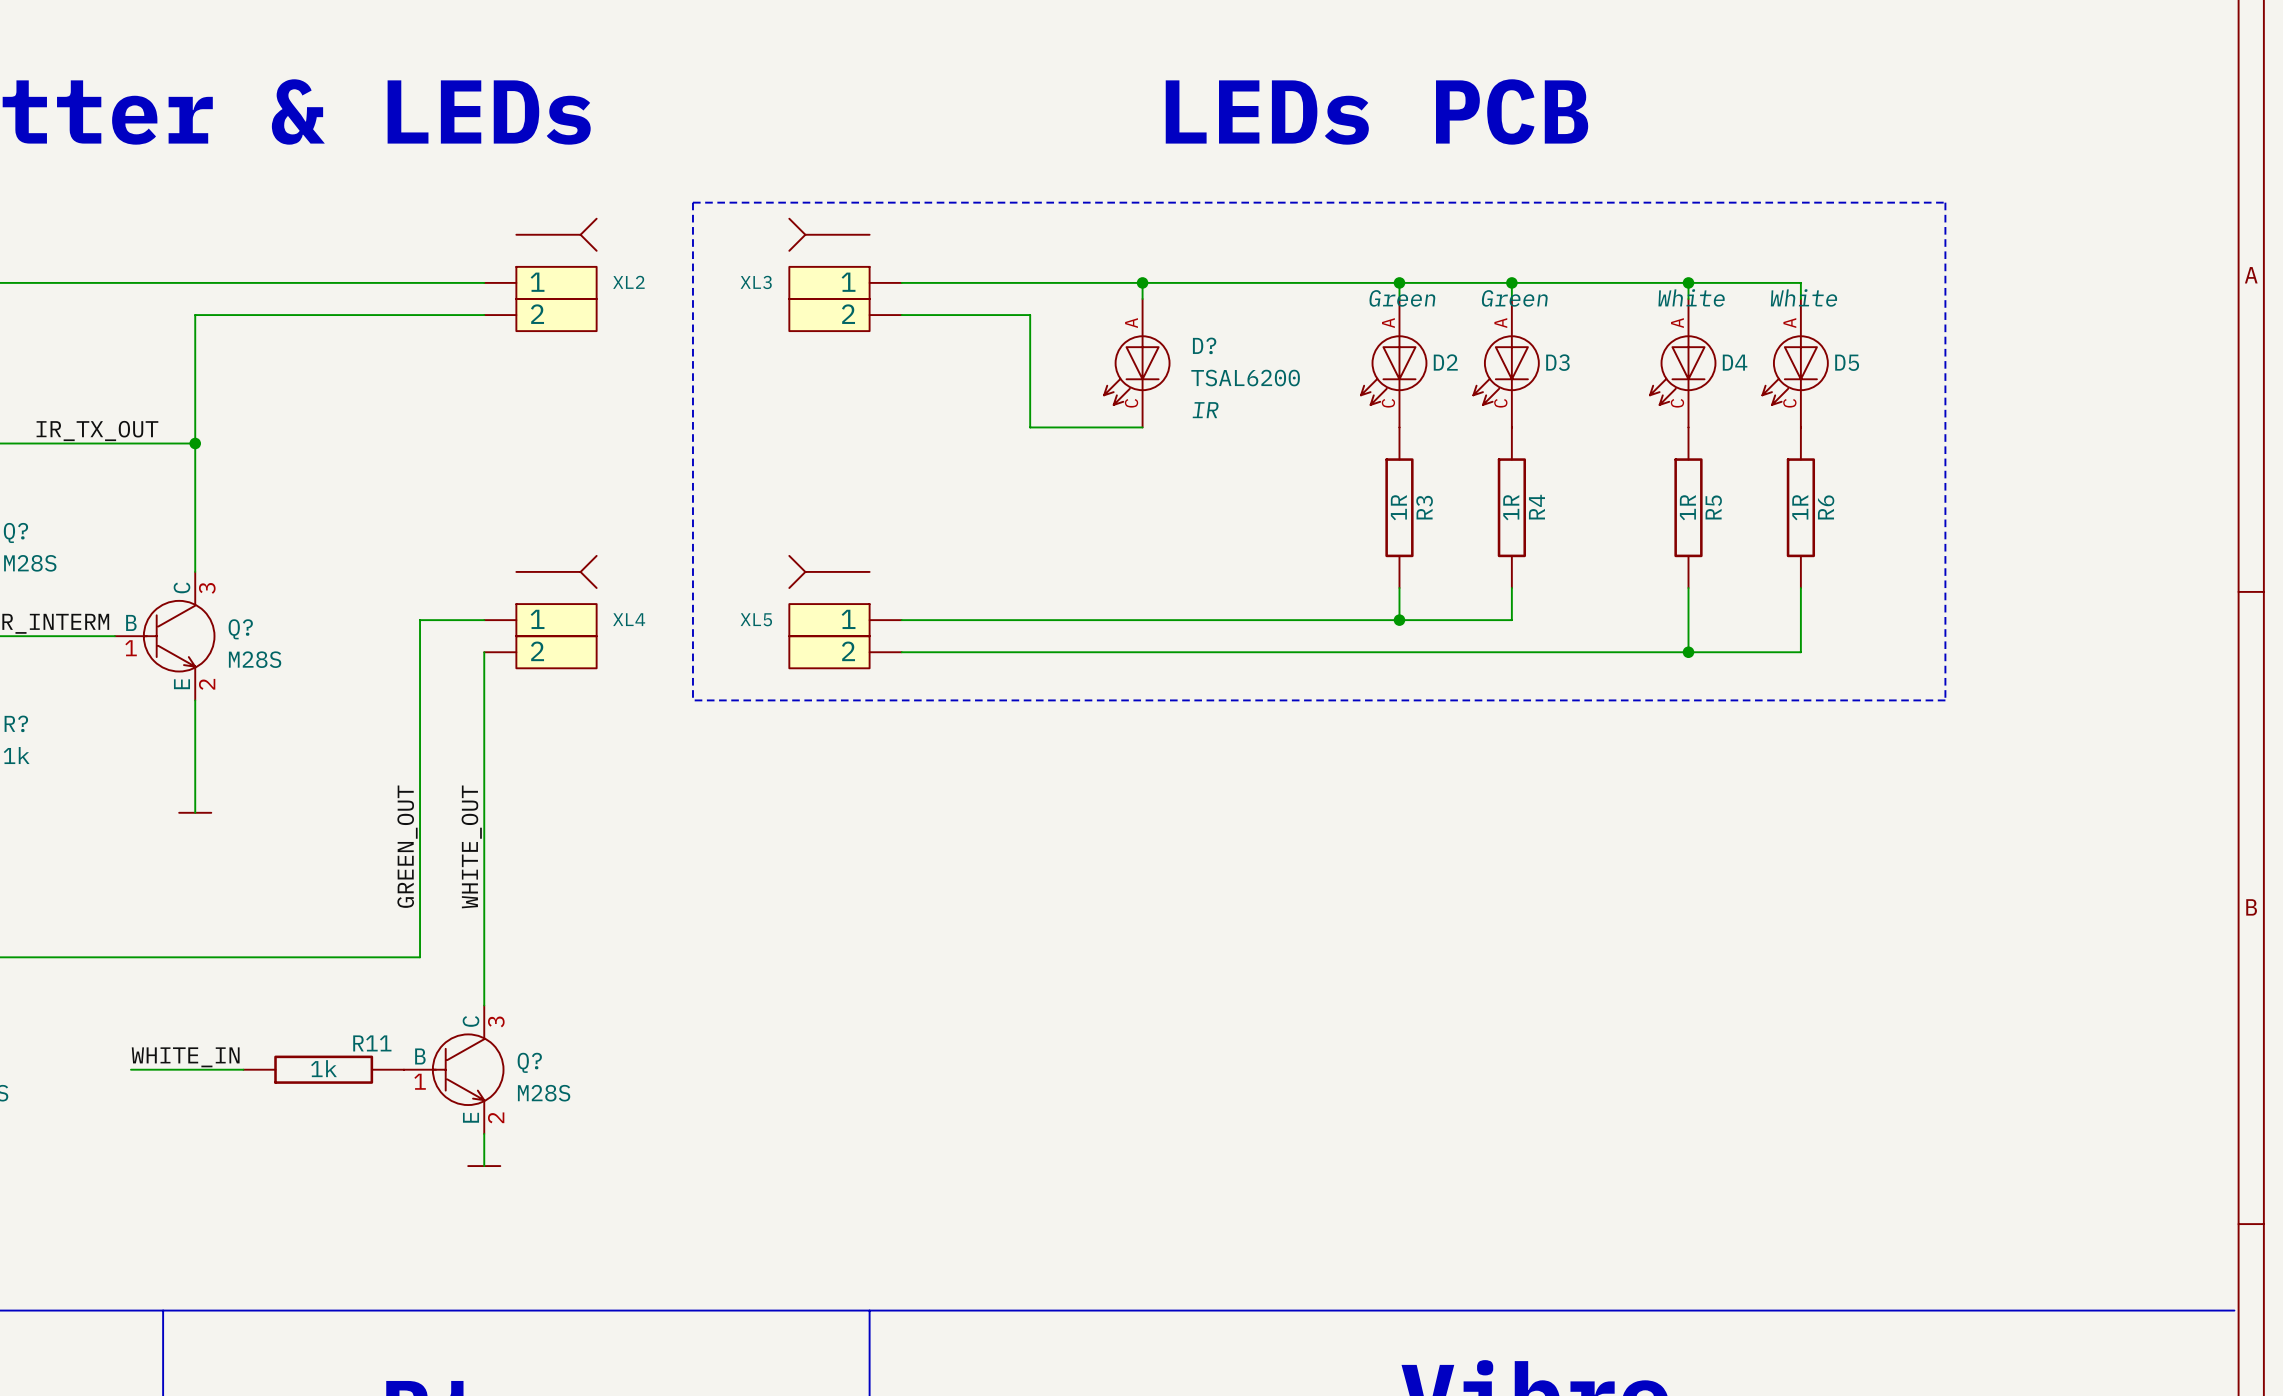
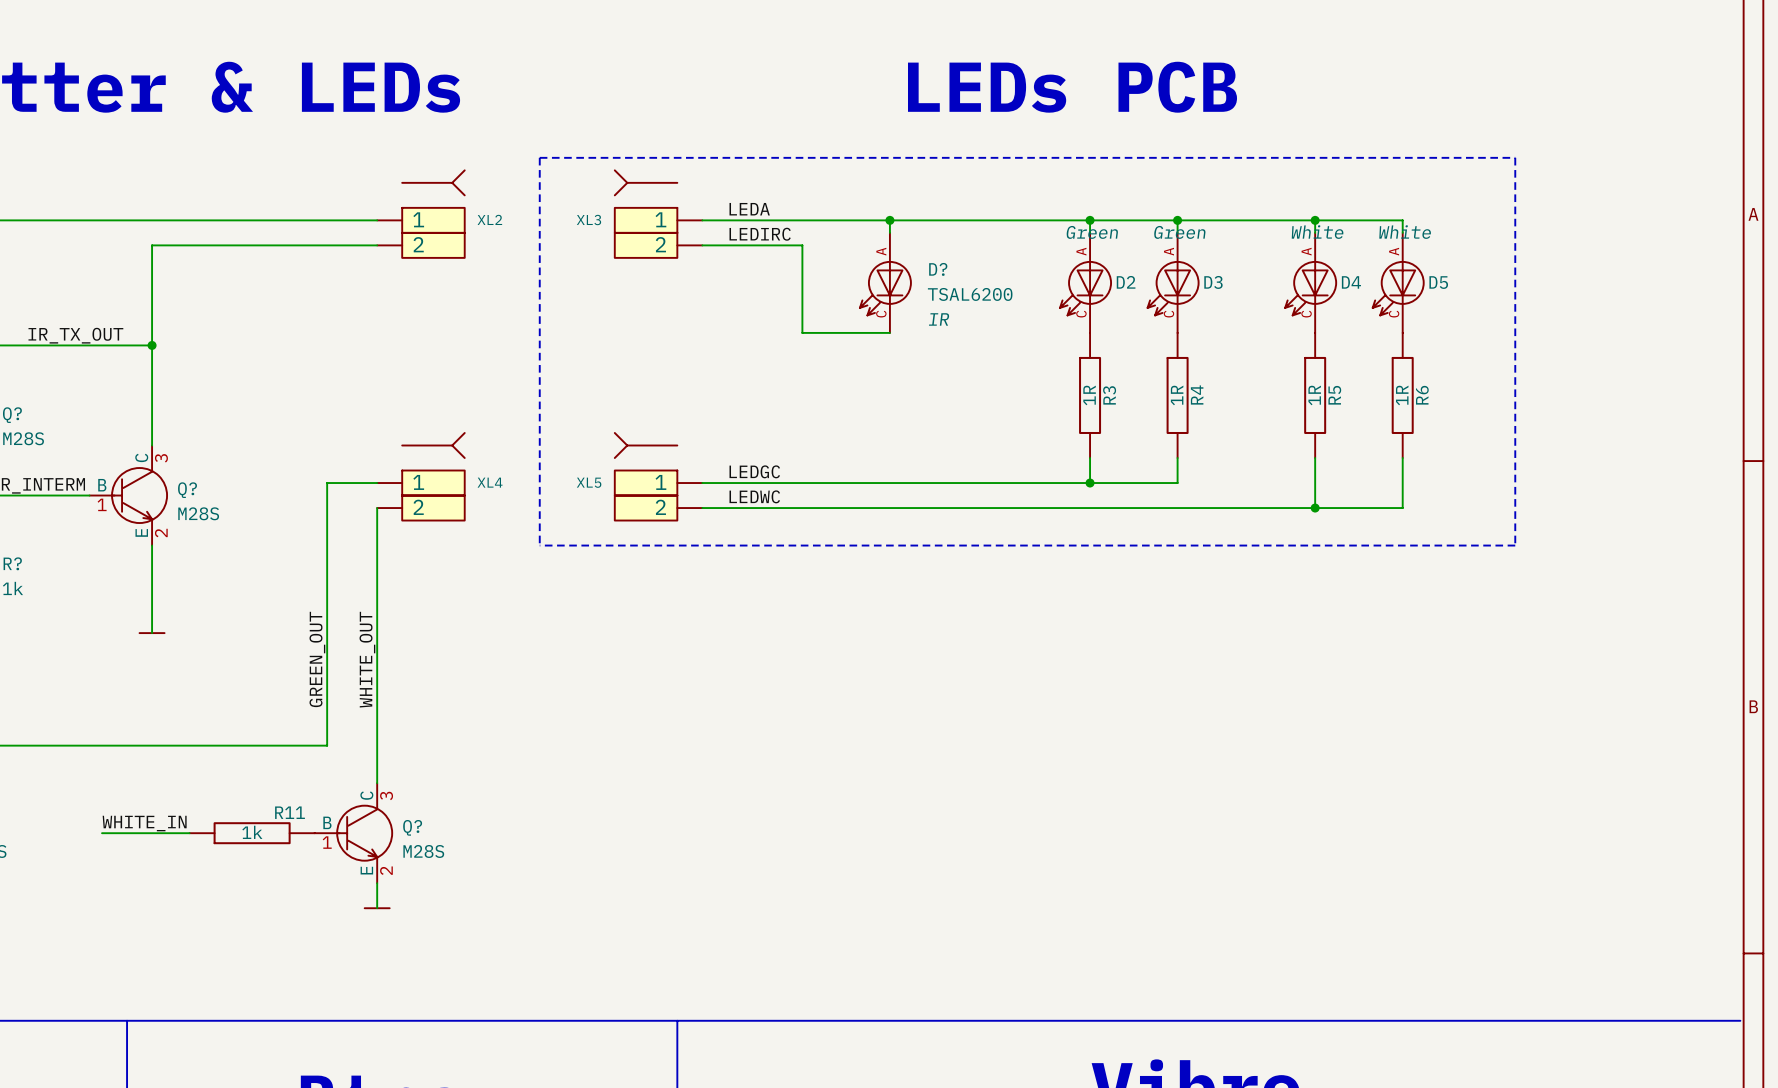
label: none -> LEDA (749, 209)
label: none -> LEDIRC (760, 234)
label: none -> LEDGC (754, 471)
label: none -> LEDWC (754, 496)

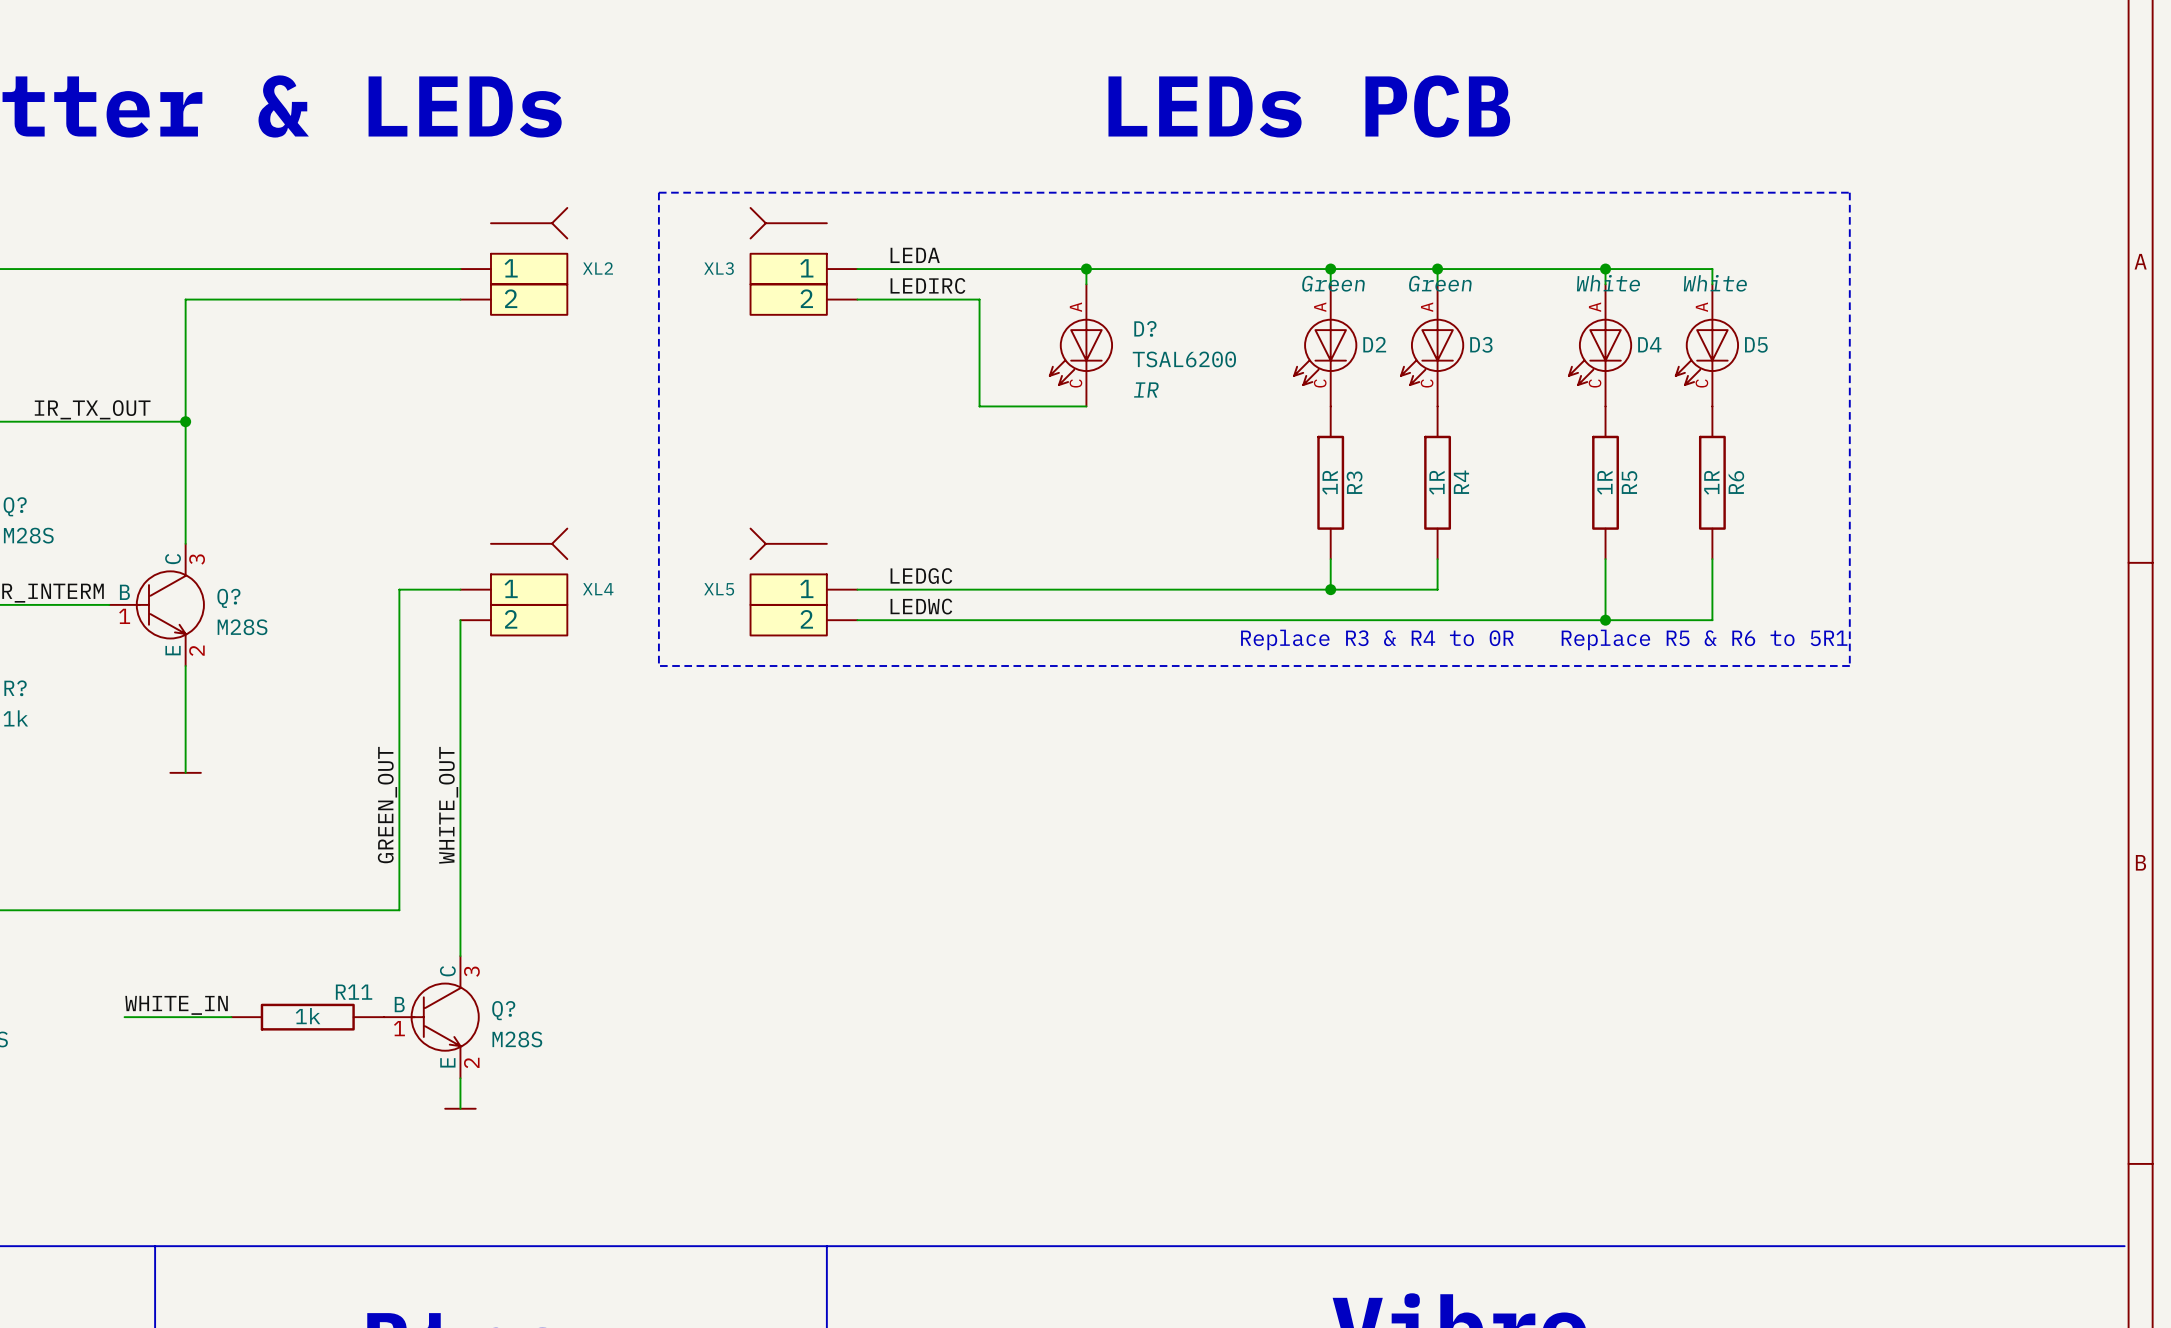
text: none -> Replace R3 & R4 to 0R (1377, 639)
text: none -> Replace R5 & R6 to 5R1 (1704, 639)

